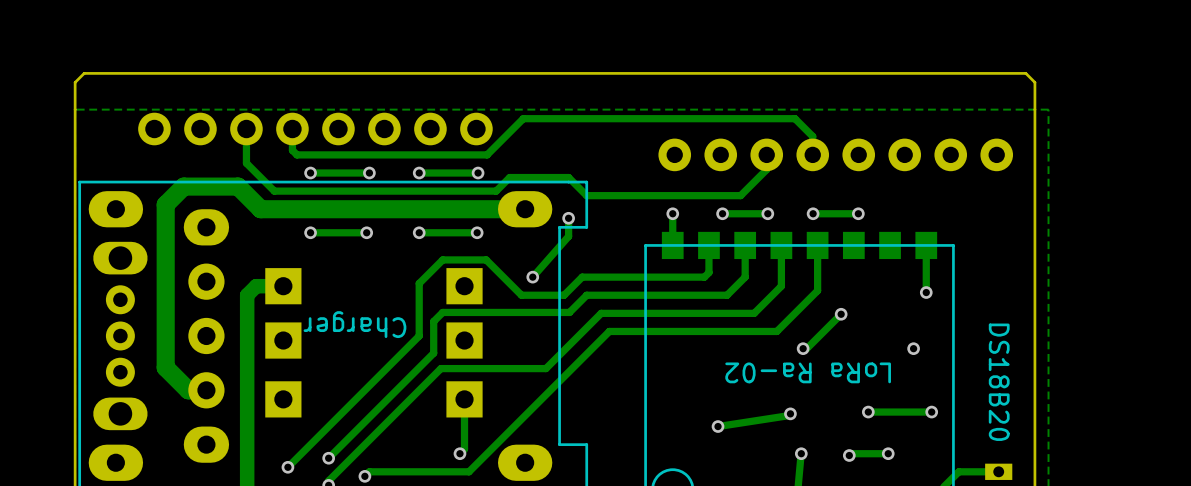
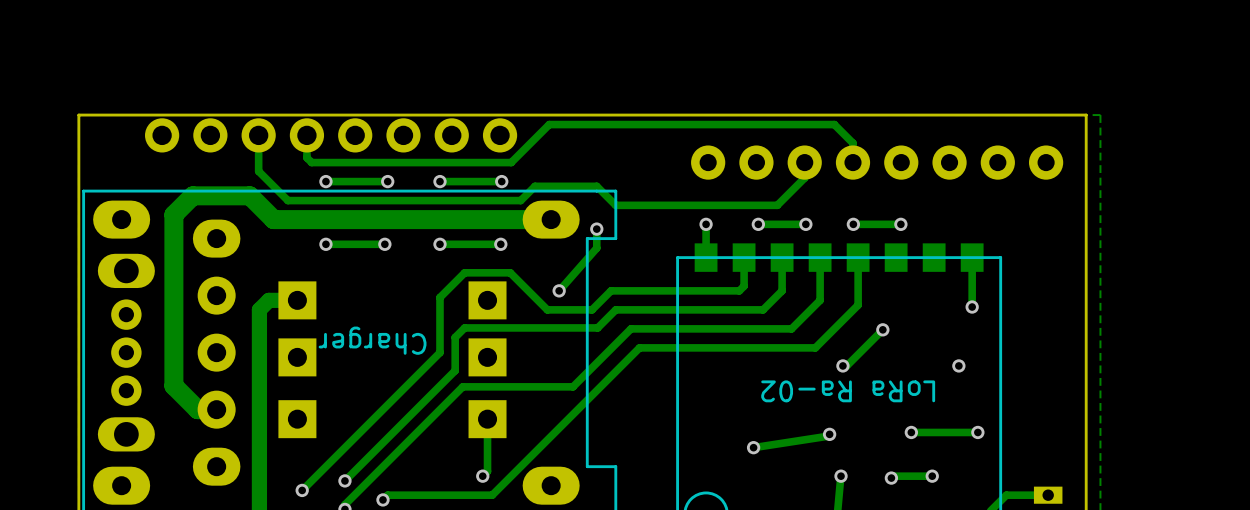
board edge: (1034, 109) (1034, 82) (1025, 73) (84, 73) (75, 82) (75, 109) -> (1086, 115) (78, 115)
text: DS18B20 (999, 382) -> none

